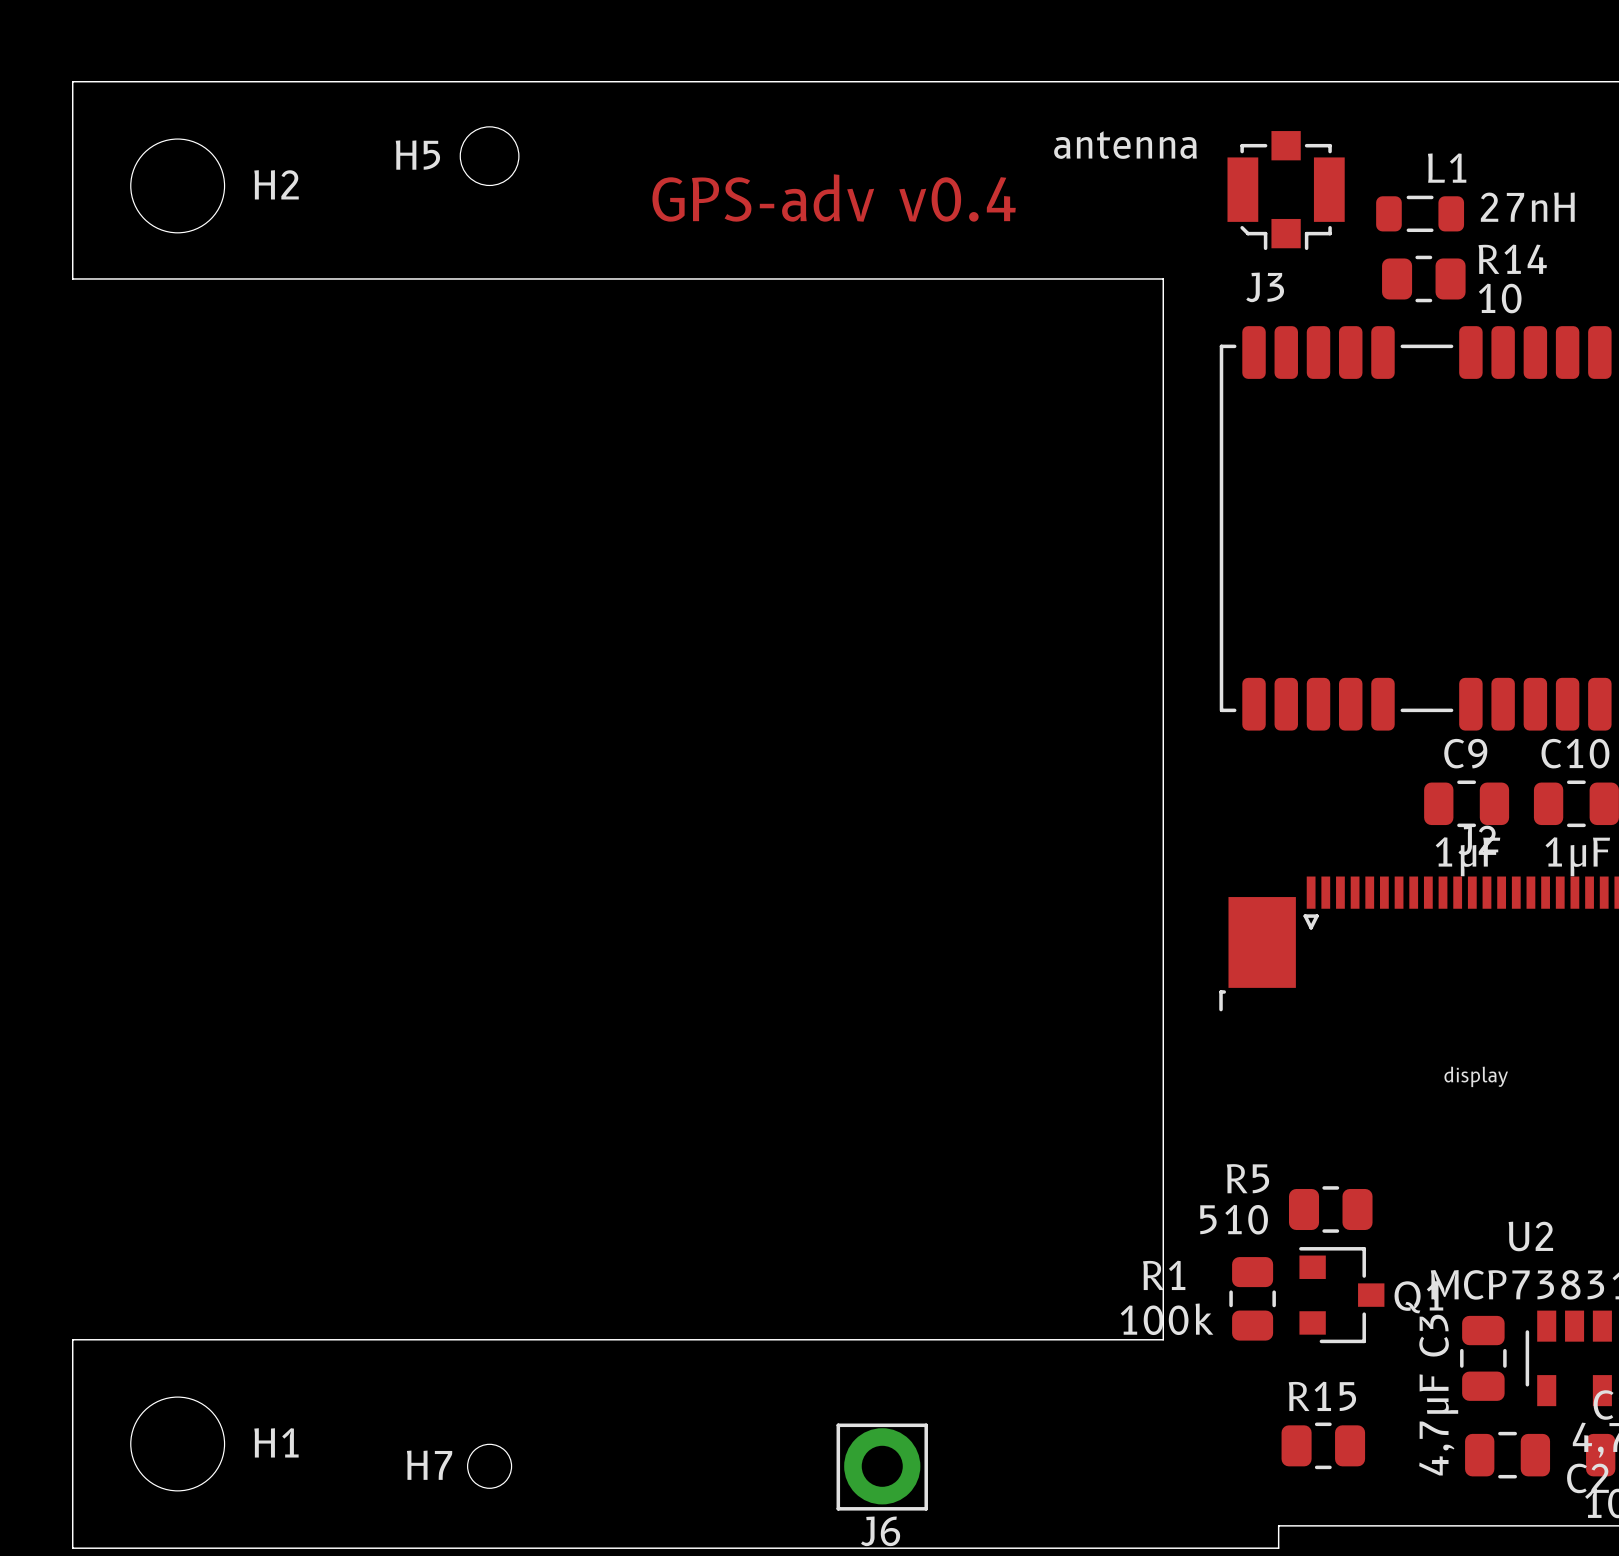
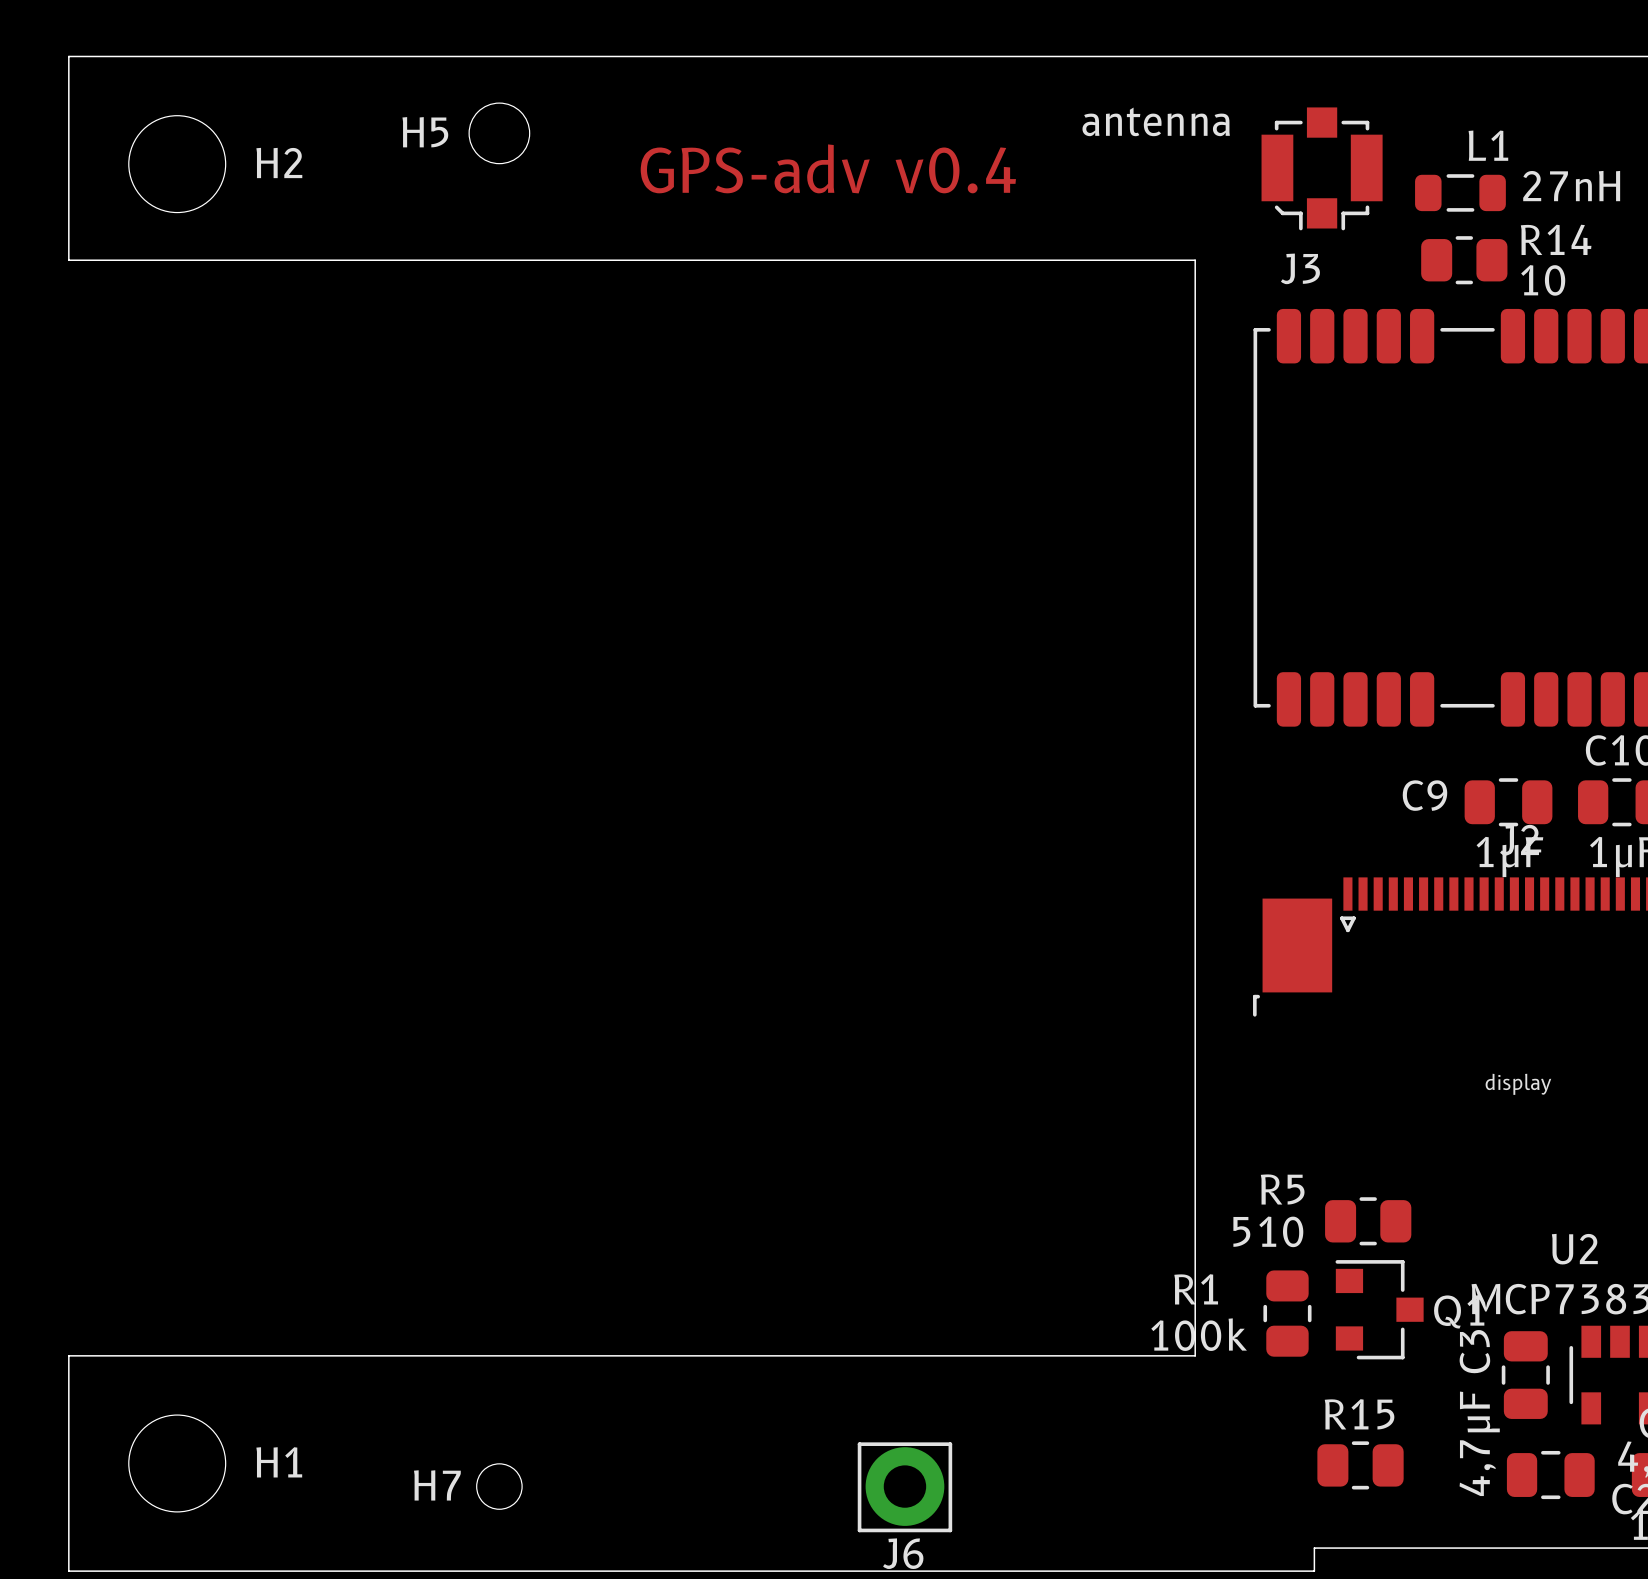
text position: GPS-adv v0.4 (834, 198) -> GPS-adv v0.4 (828, 168)
C9 name position: C9 (1465, 753) -> C9 (1424, 795)

